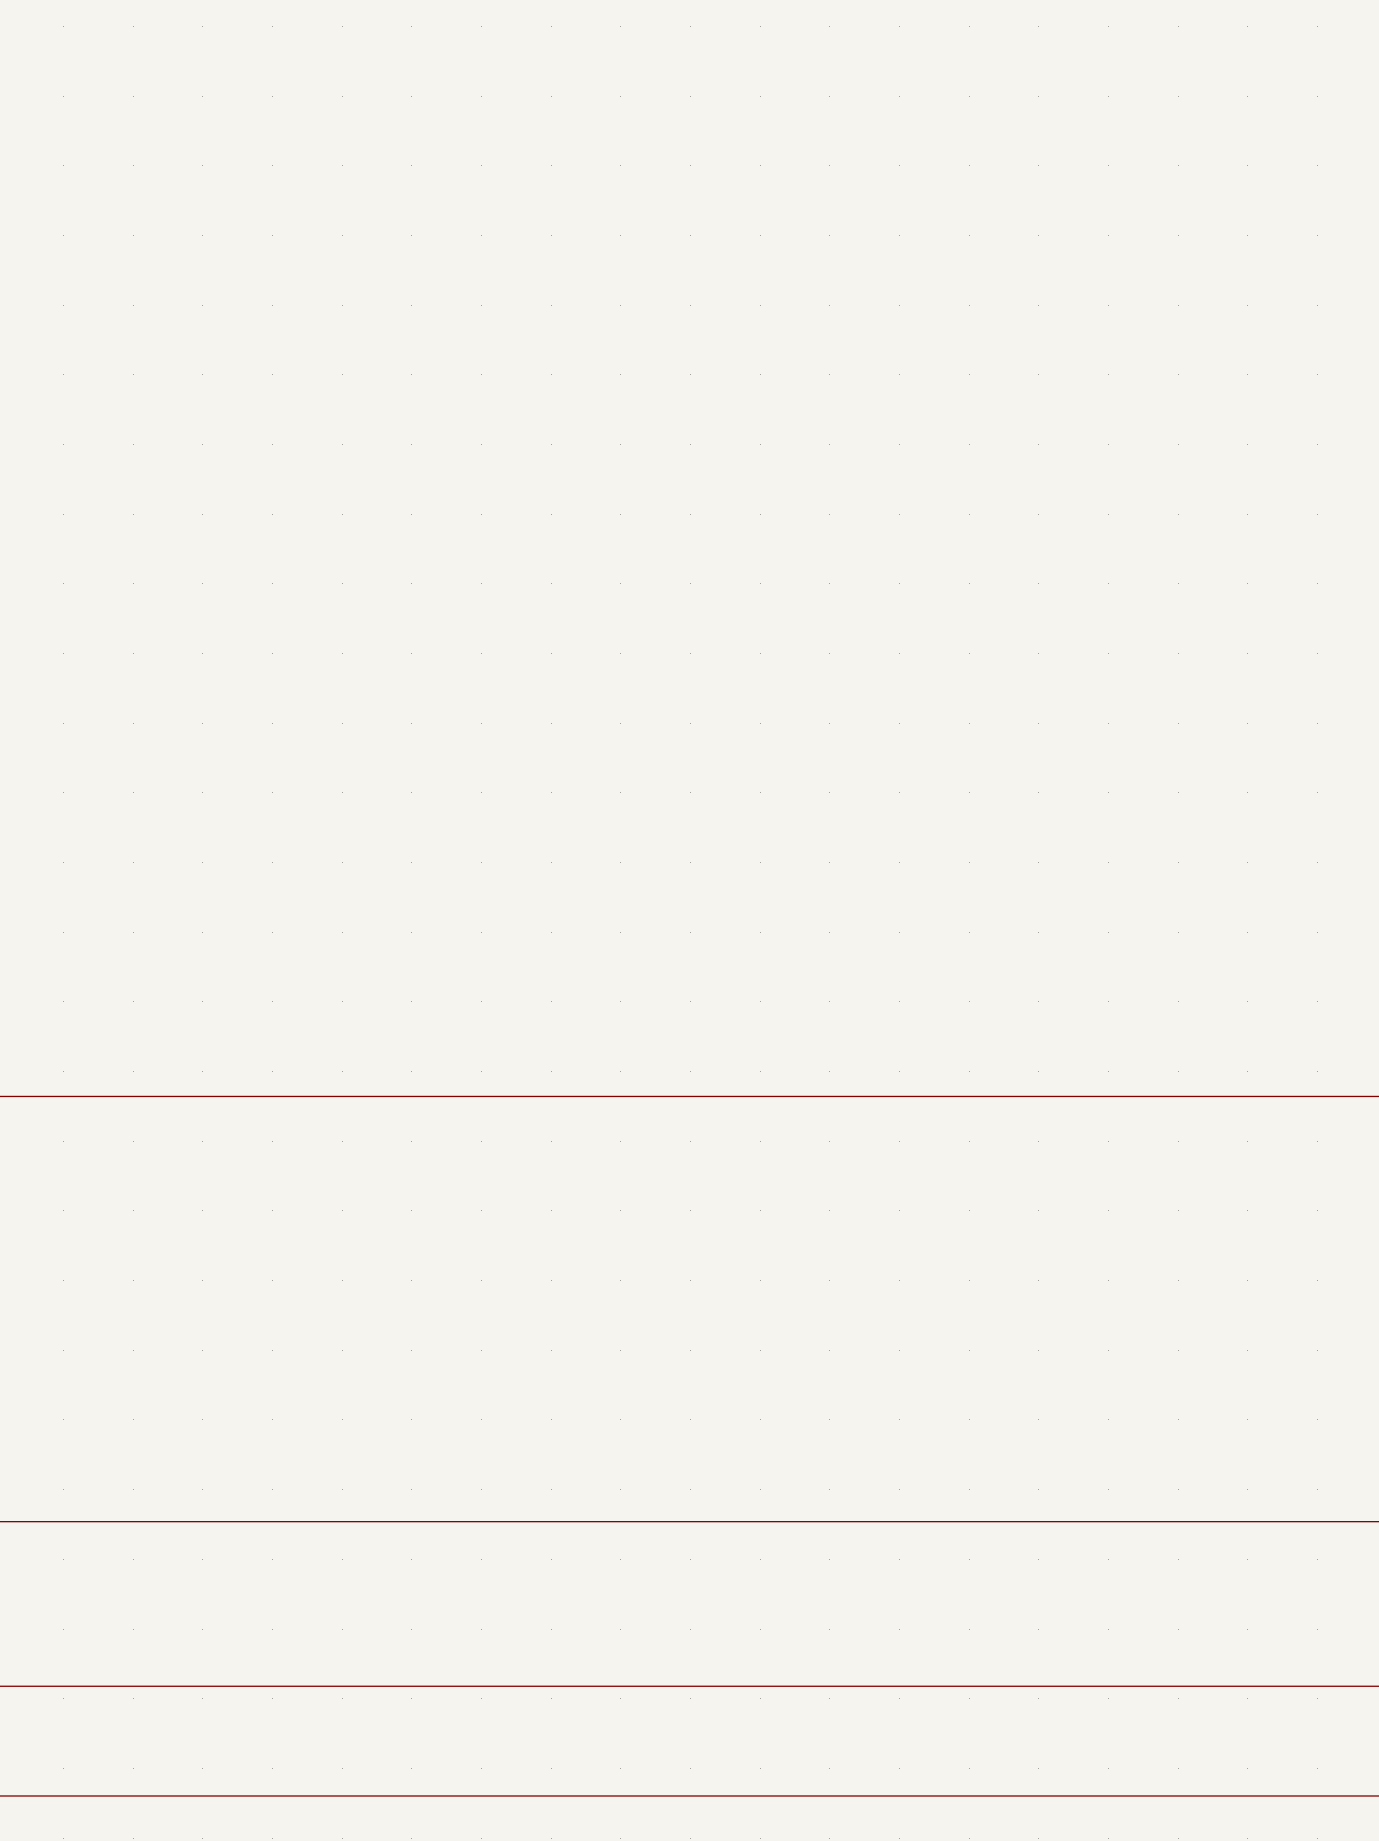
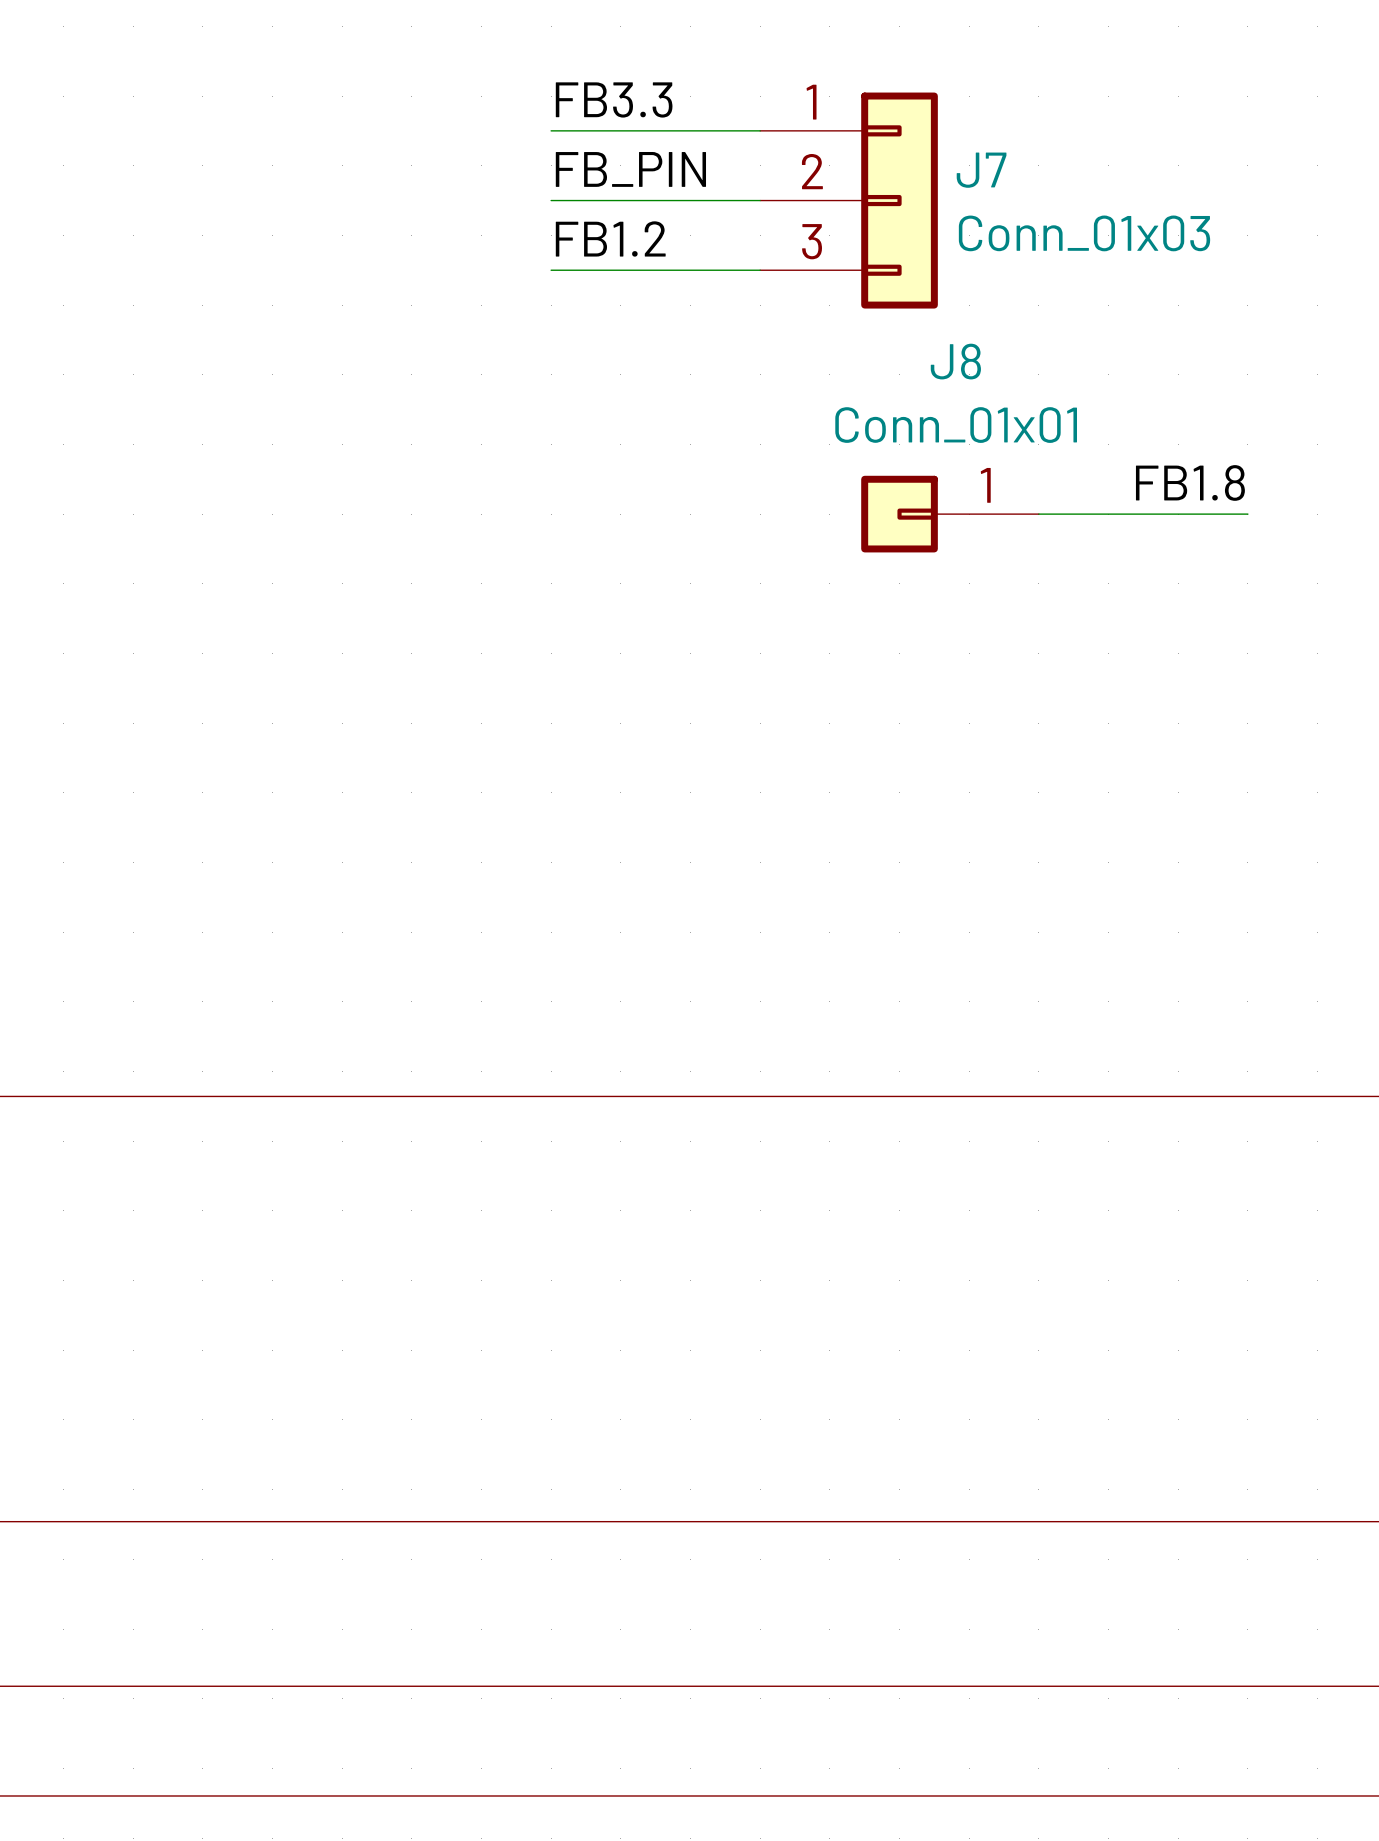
label: none -> FB3.3 (614, 99)
wire: none -> (551, 130) (760, 130)
label: none -> FB_PIN (630, 169)
wire: none -> (551, 200) (760, 200)
J7: none -> Conn_01x03 (849, 200)
label: none -> FB1.2 (610, 238)
wire: none -> (551, 270) (760, 270)
label: none -> FB1.8 (1190, 482)
J8: none -> Conn_01x01 (950, 514)
wire: none -> (1038, 514) (1247, 514)

